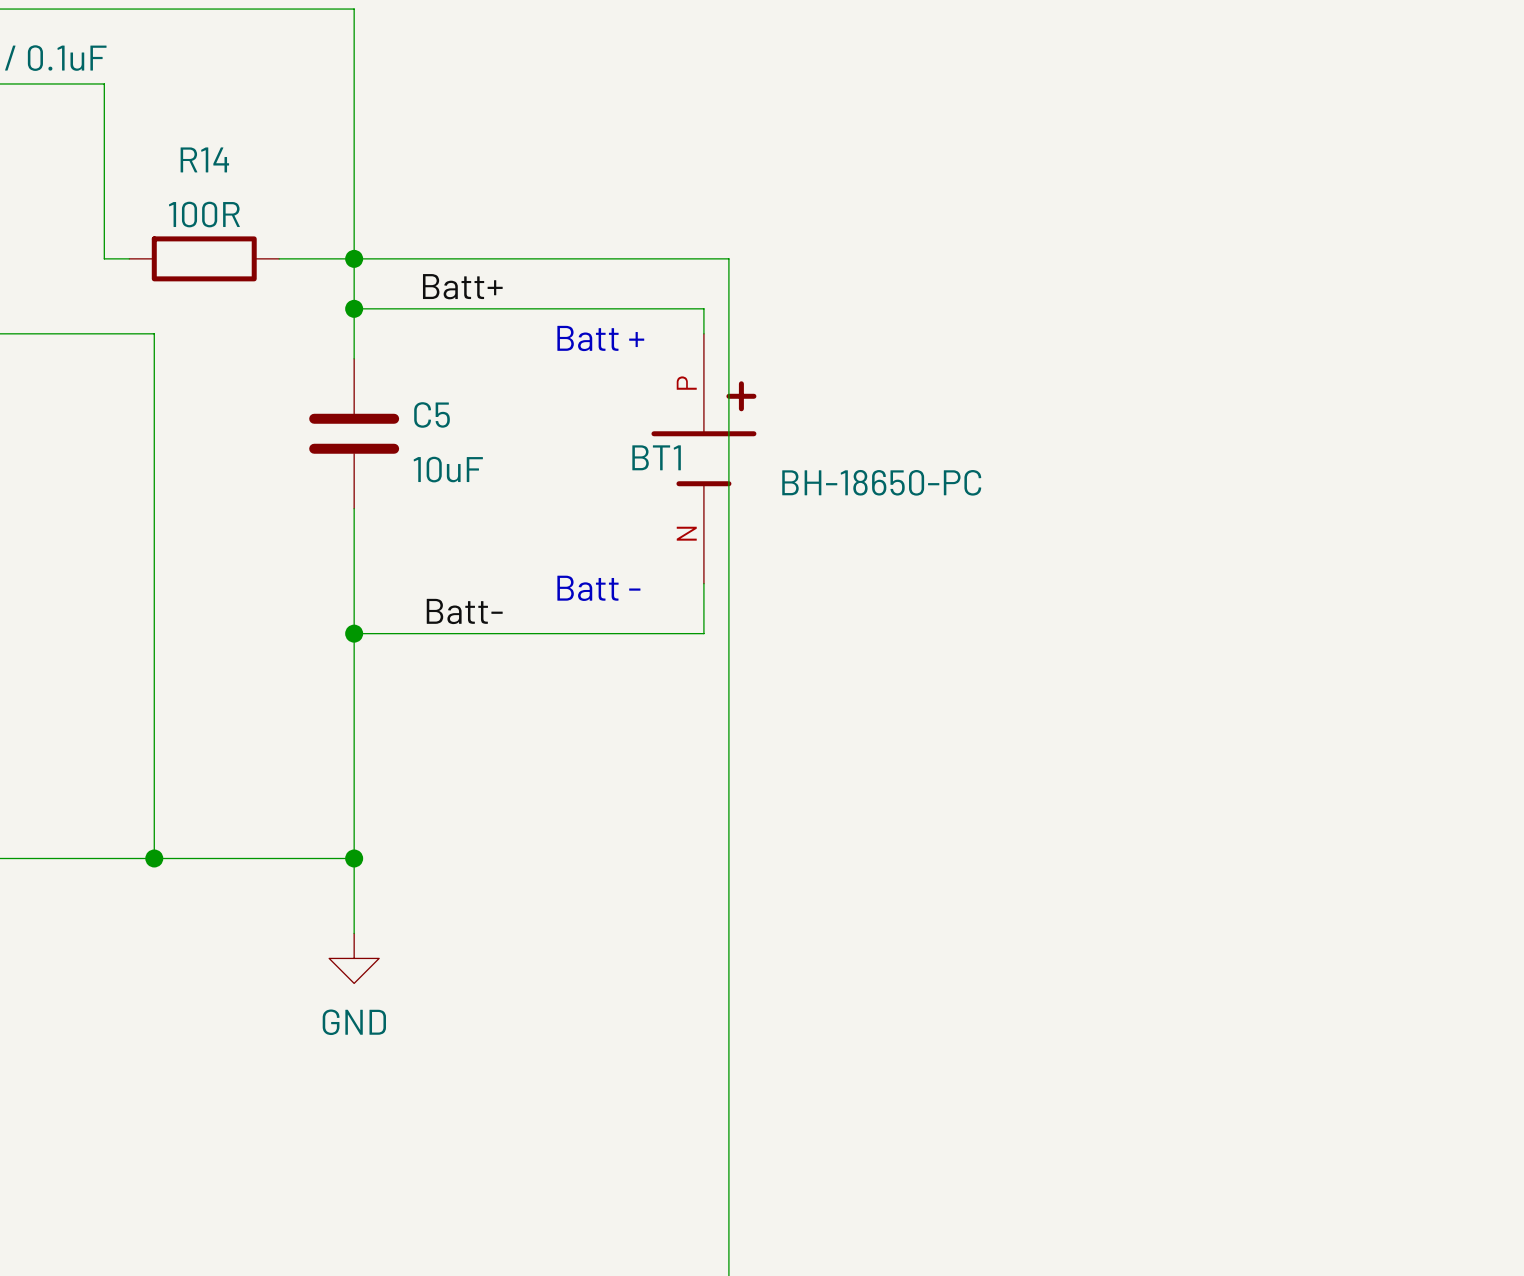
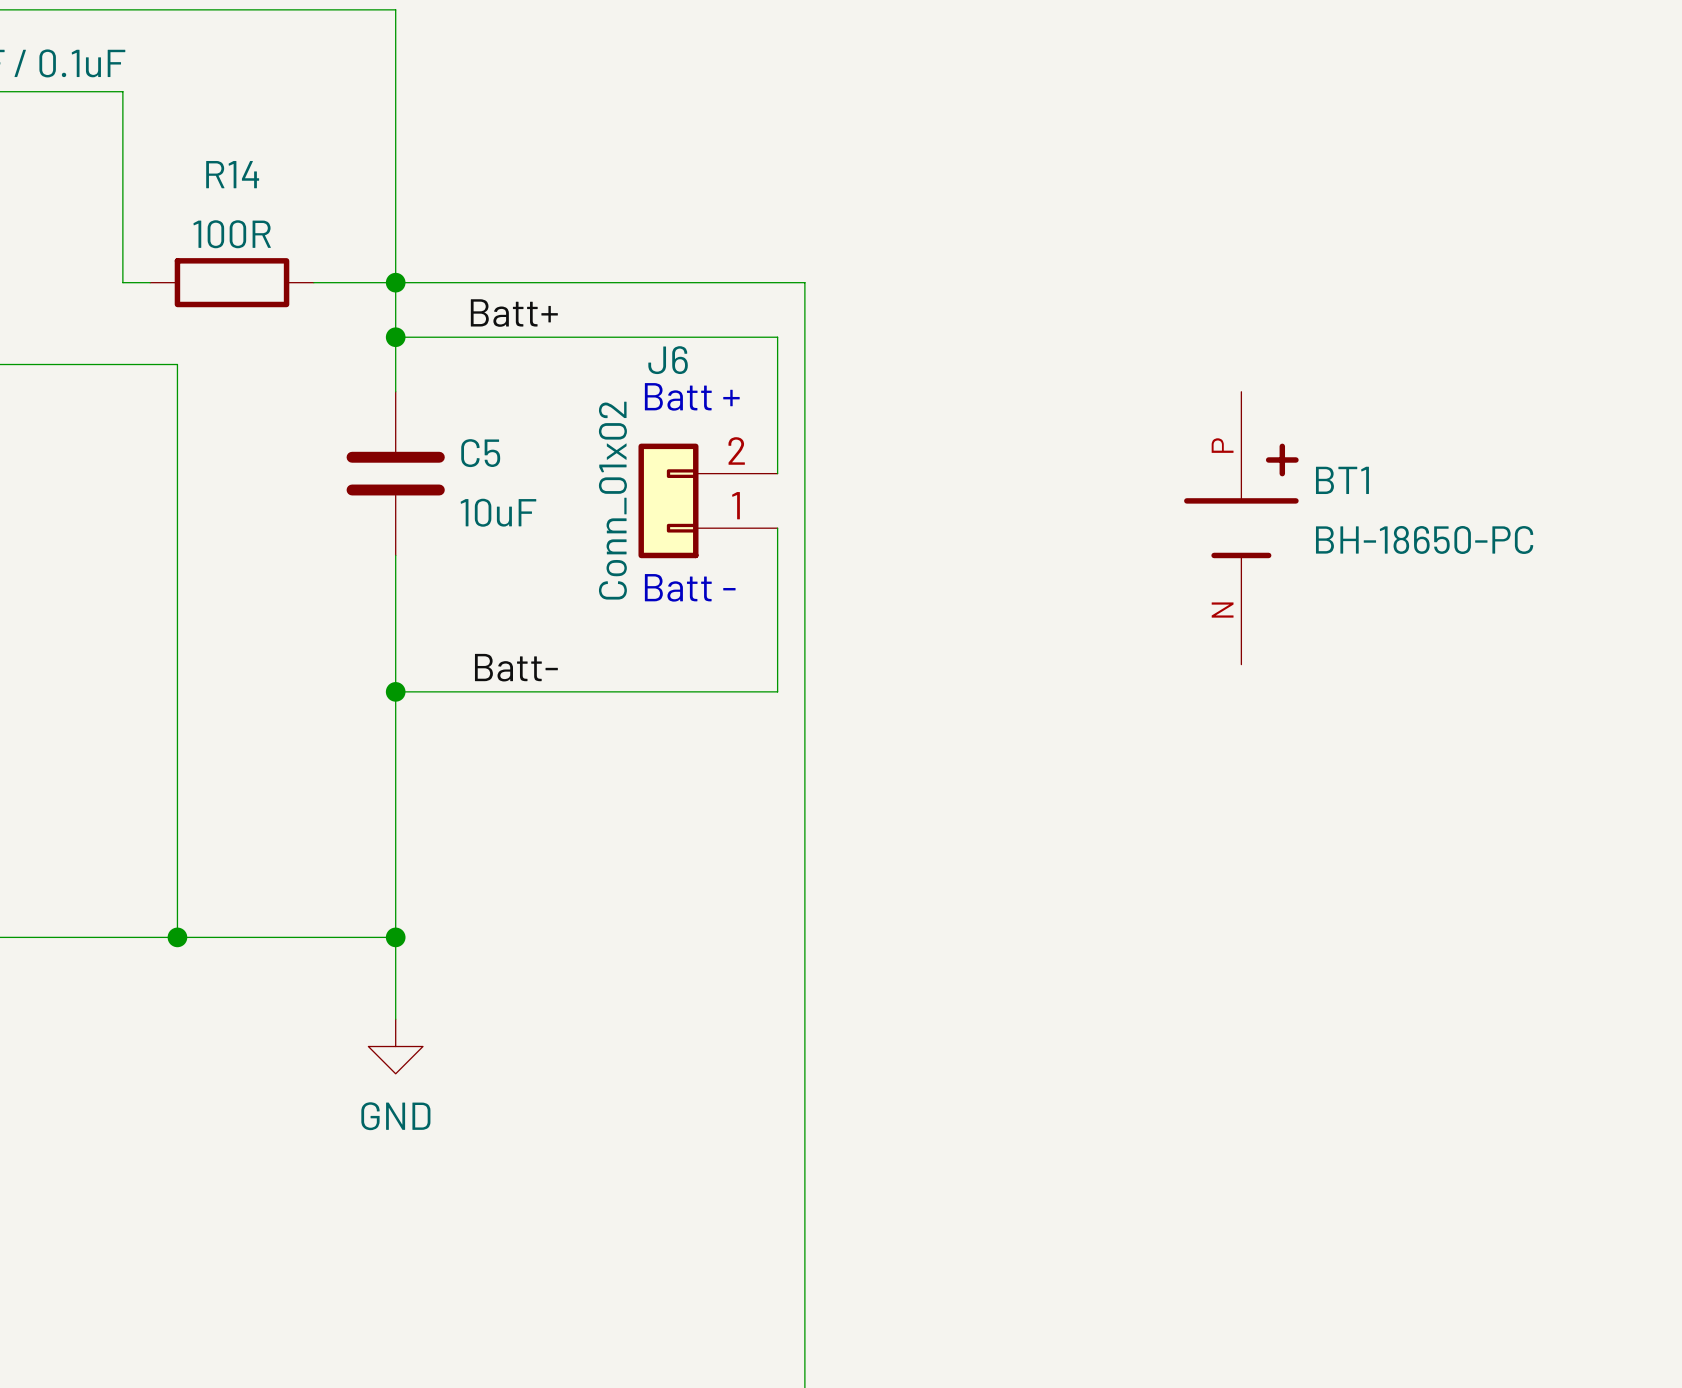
text position: Batt + (600, 338) -> Batt + (692, 396)
BT1 name position: BT1 (656, 457) -> BT1 (1342, 480)
J6: none -> Conn_01x02 (708, 500)
BT1 position: (703, 458) -> (1241, 528)
BT1 value position: BH-18650-PC (881, 482) -> BH-18650-PC (1424, 539)
text position: Batt - (598, 588) -> Batt - (690, 587)

